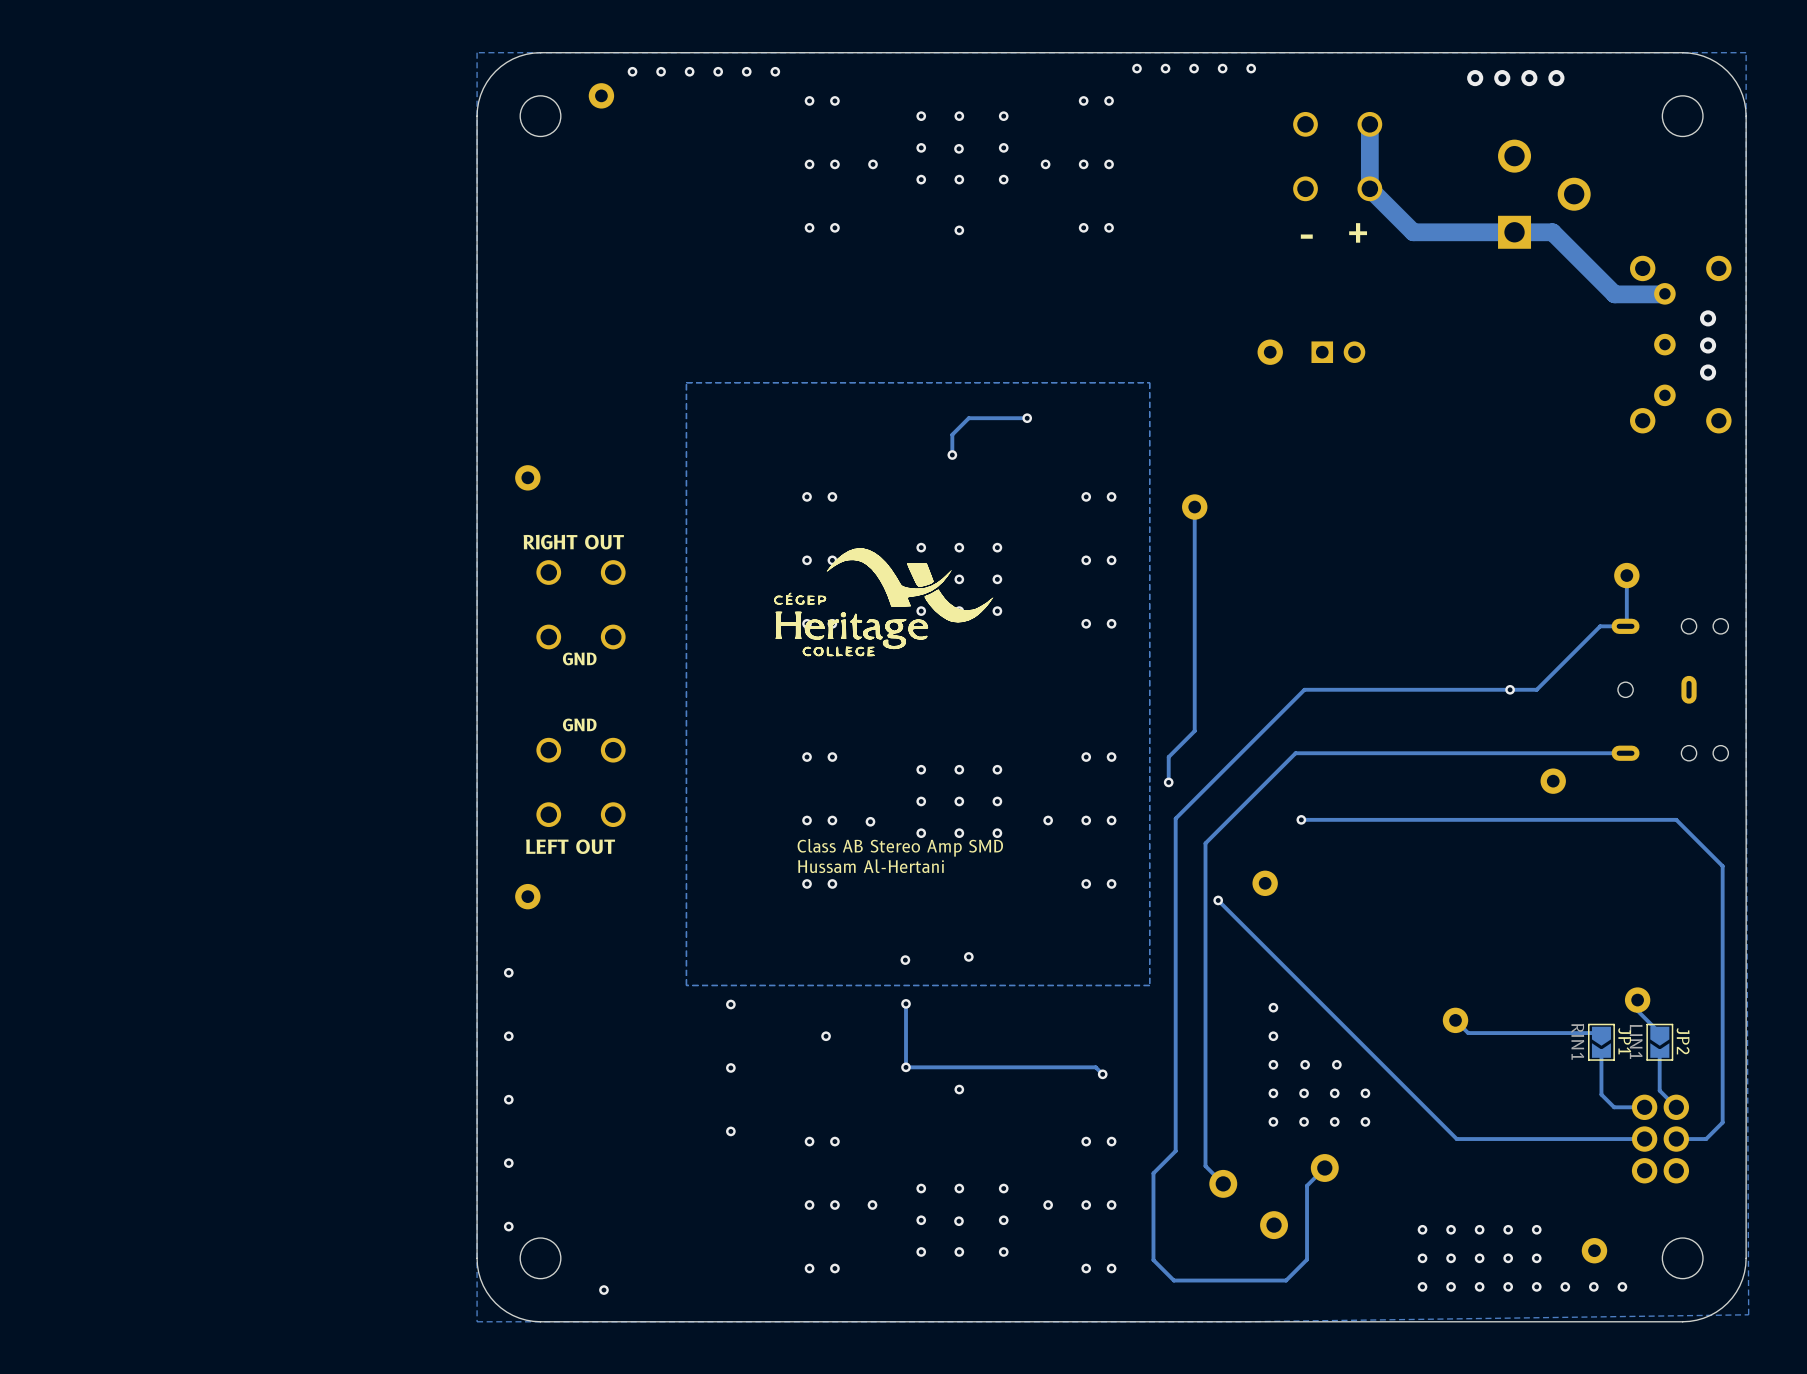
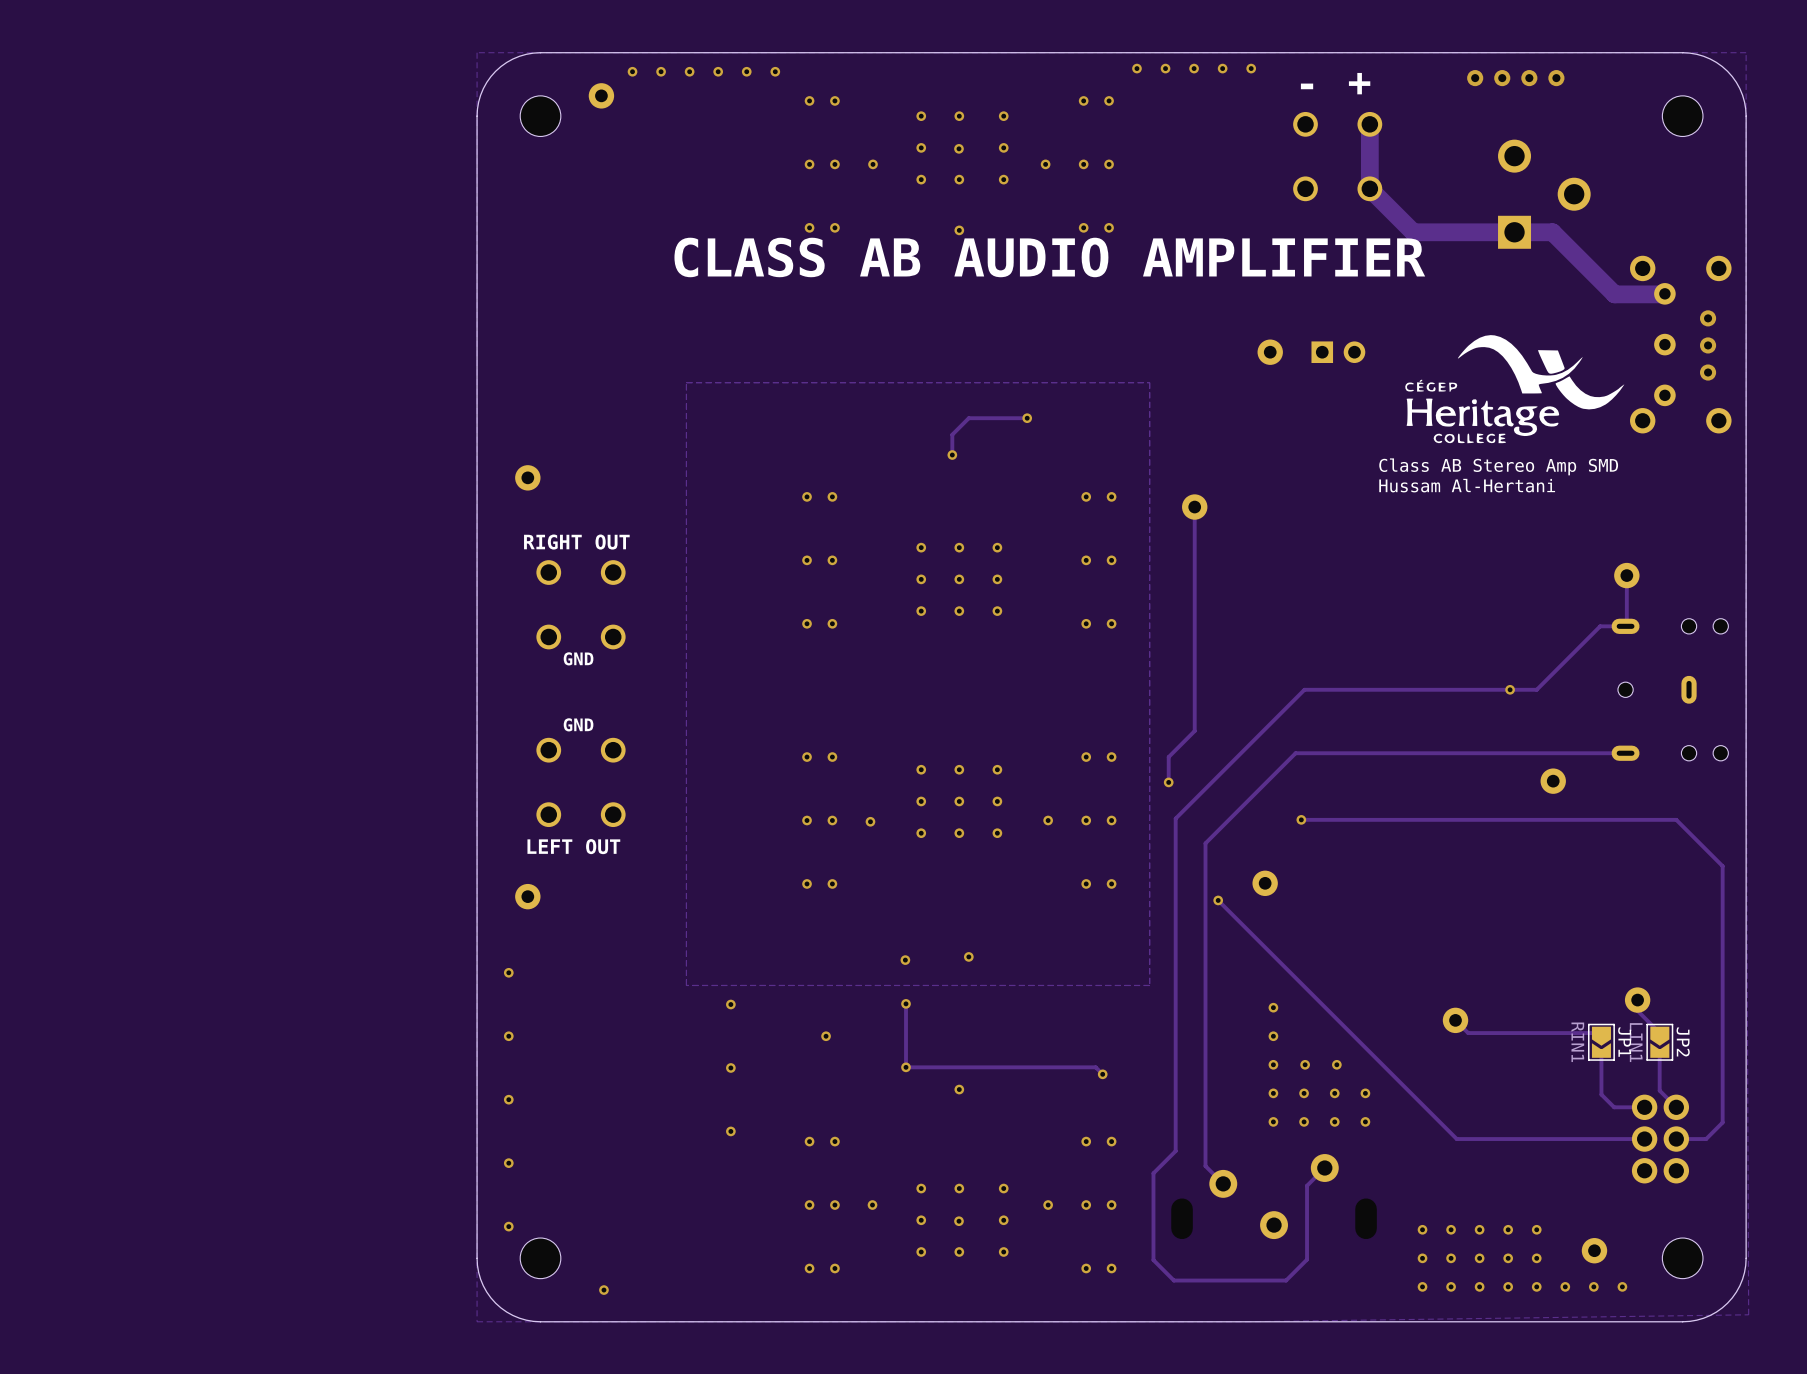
text position: + (1358, 232) -> + (1359, 83)
text position: - (1306, 236) -> - (1307, 86)
text: none -> CLASS AB AUDIO AMPLIFIER (1049, 257)
drawing: none -> [1405, 335, 1625, 444]
text: none -> Class AB Stereo Amp SMD (1498, 466)
text: none -> Hussam Al-Hertani (1467, 485)
drawing: [774, 548, 994, 657] -> none
text: Class AB Stereo Amp SMD (900, 847) -> none
text: Hussam Al-Hertani (870, 866) -> none

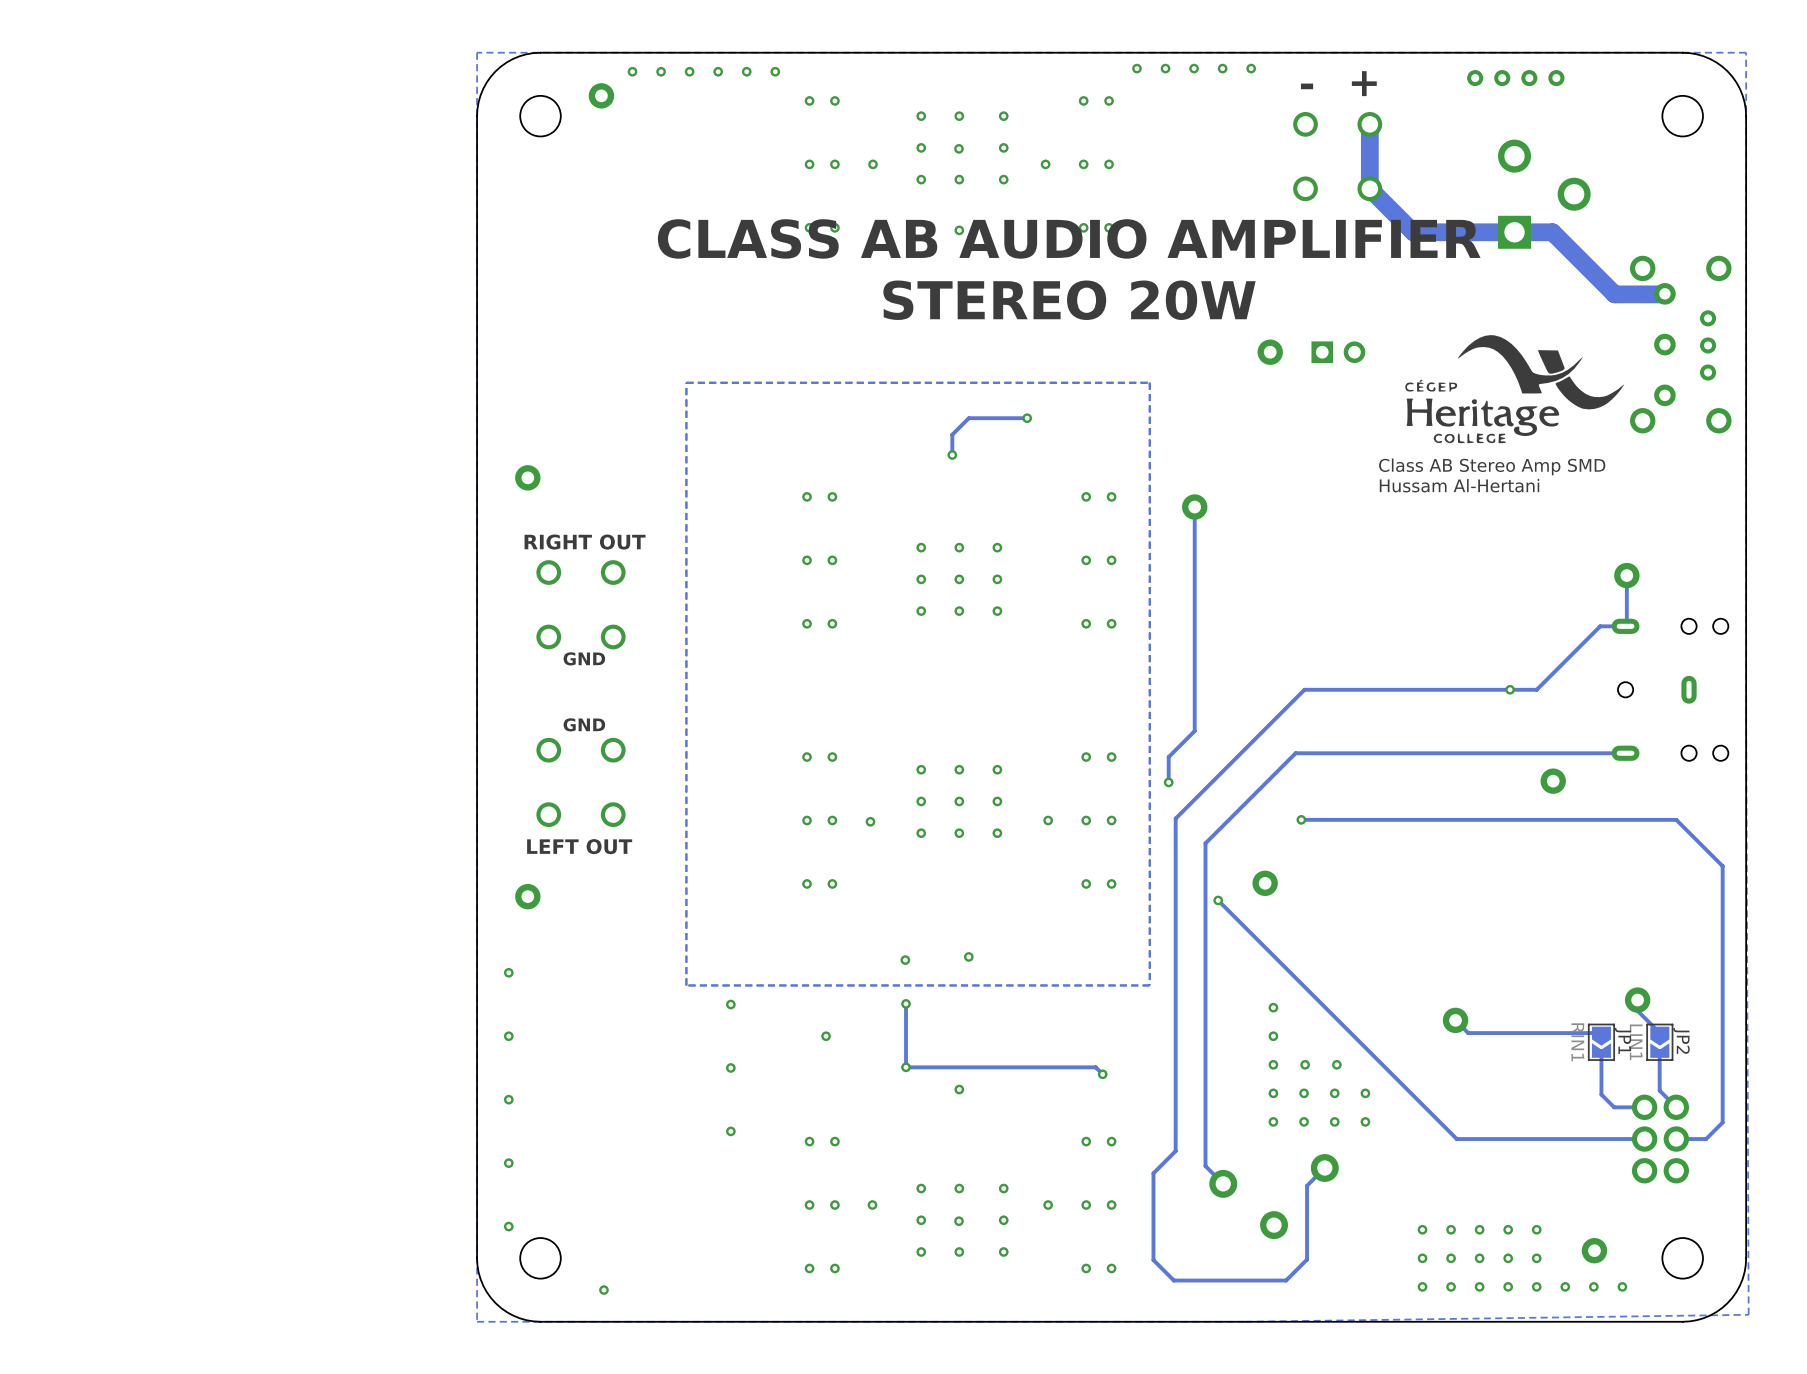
text: none -> CLASS AB AUDIO AMPLIFIER (1069, 238)
text: CLASS AB AUDIO AMPLIFIER (1049, 257) -> none
text: none -> STEREO 20W (1069, 300)

